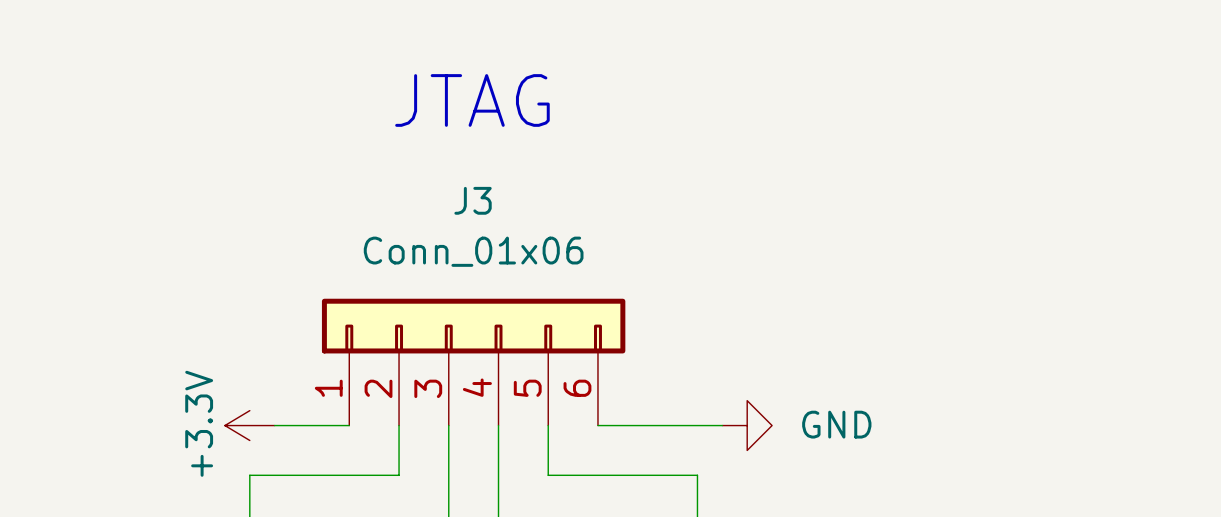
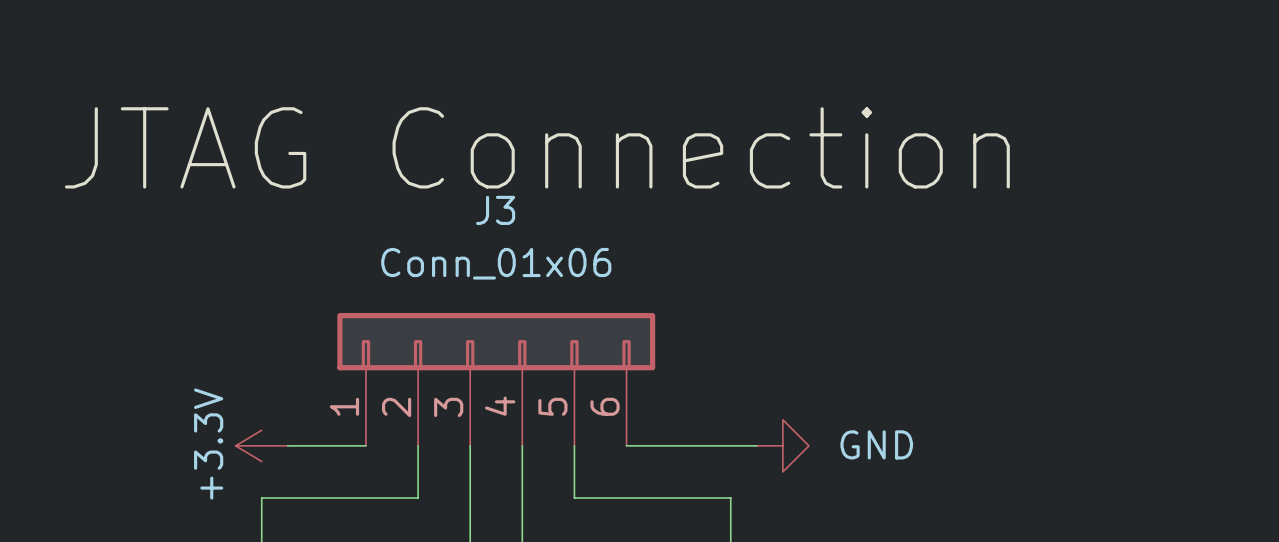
text: JTAG (472, 100) -> none
label: none -> JTAG Connection (537, 147)

